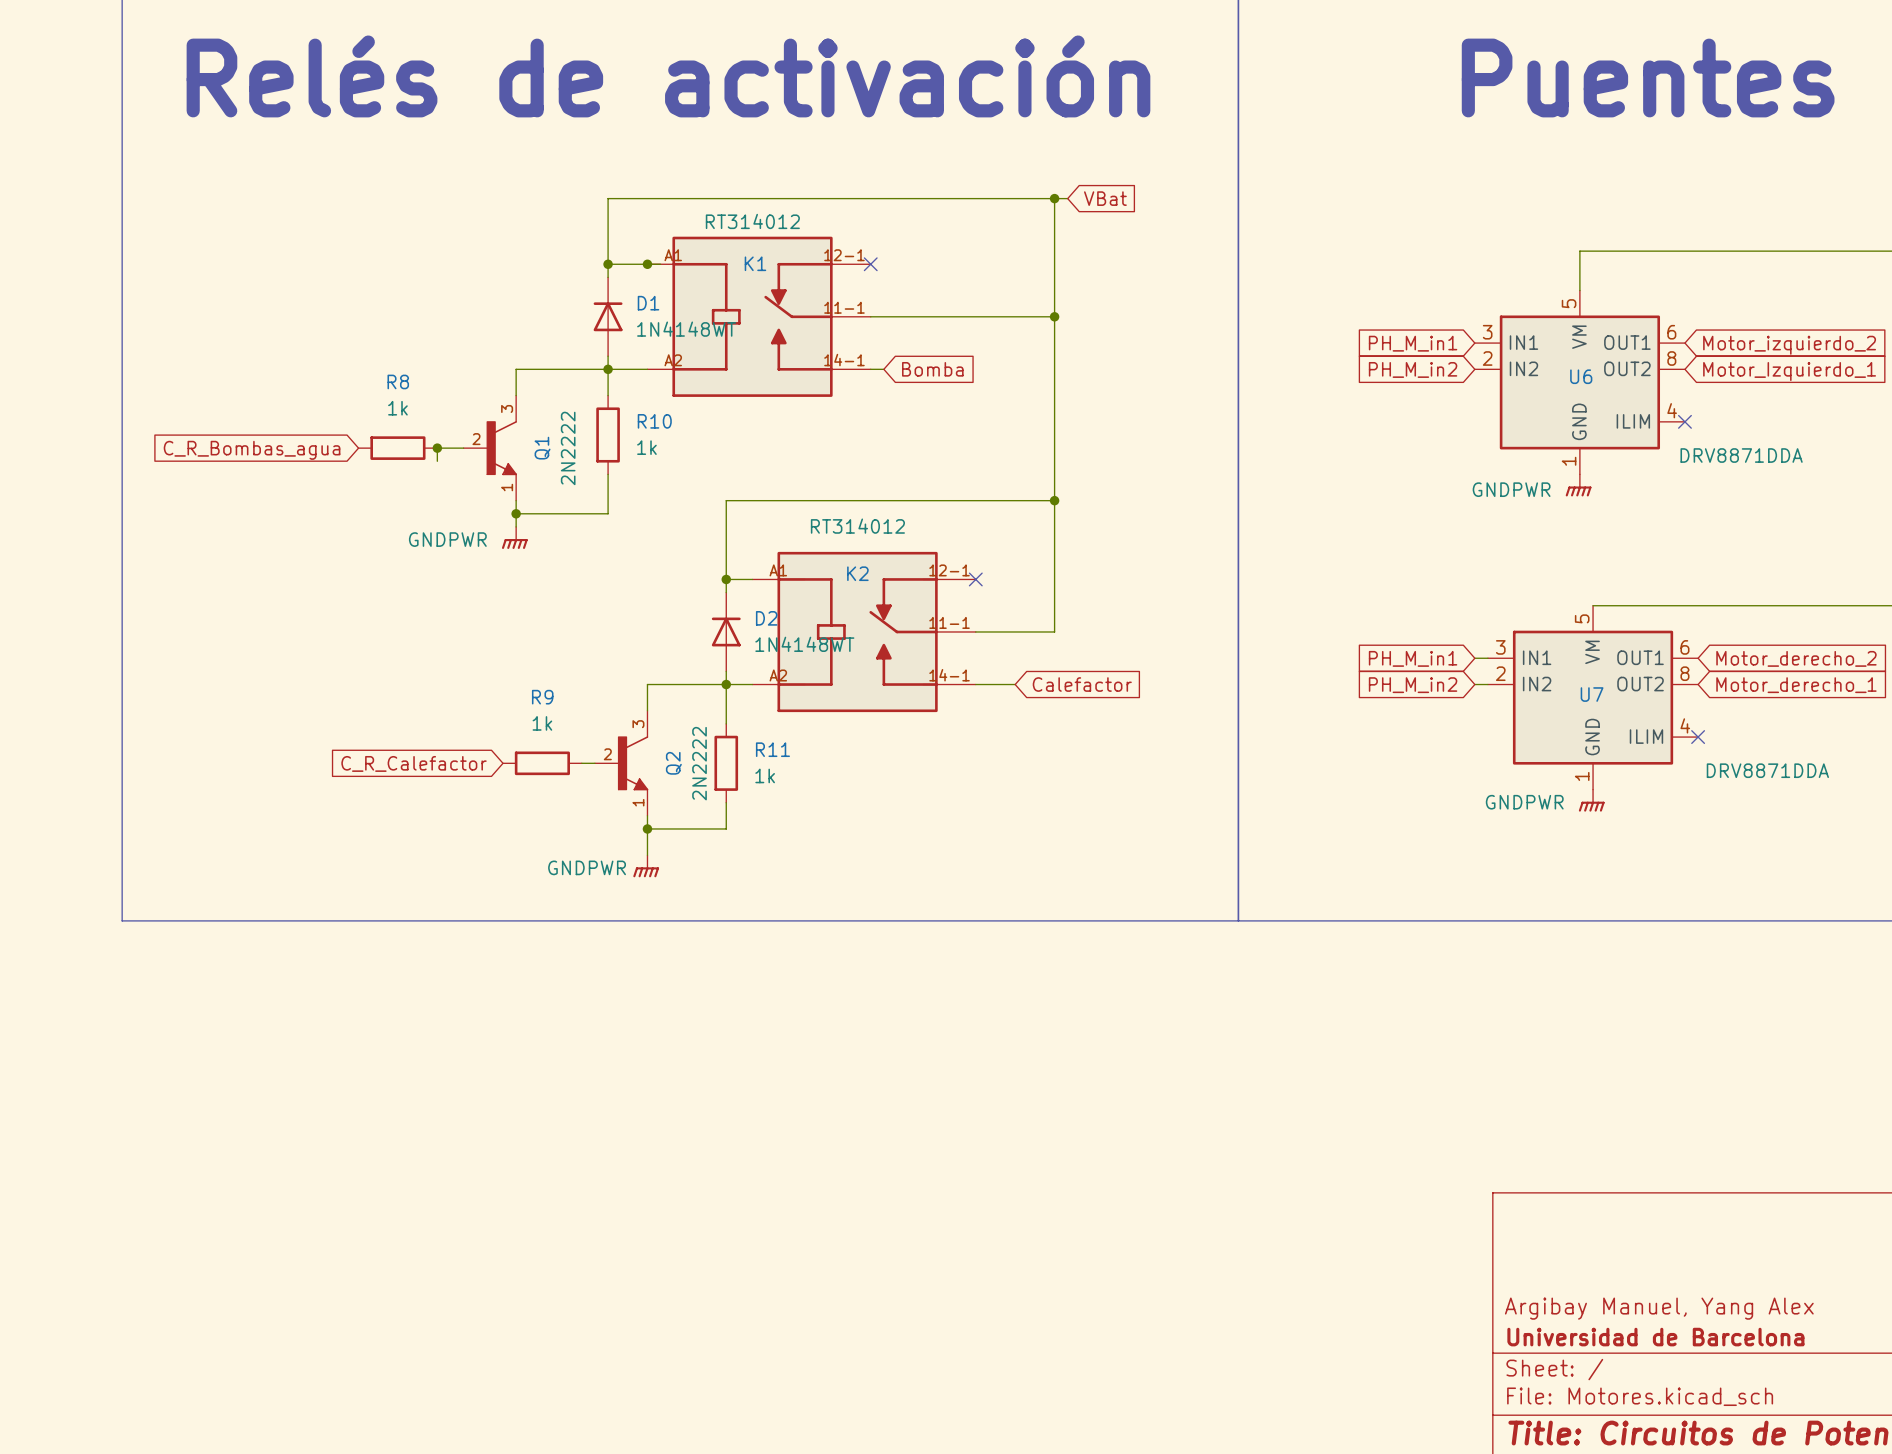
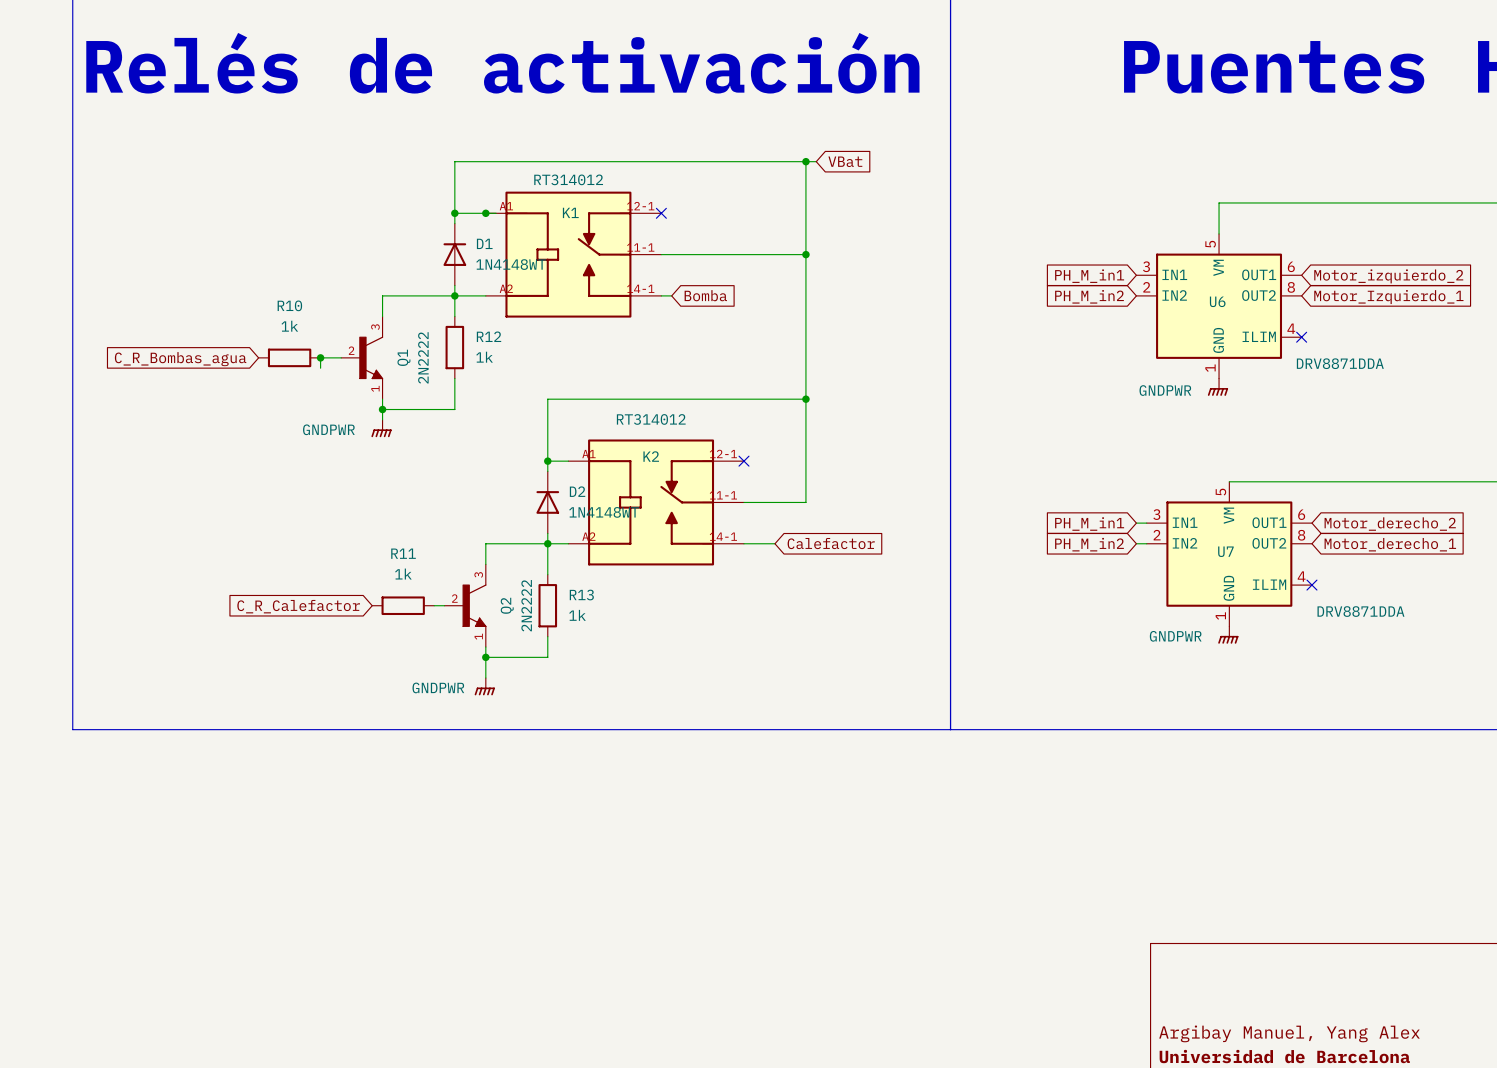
R8 name: R8 (398, 381) -> R10 (289, 305)
R10 name: R10 (654, 421) -> R12 (489, 336)
R9 name: R9 (542, 697) -> R11 (403, 553)
R11 name: R11 (772, 749) -> R13 (581, 595)

